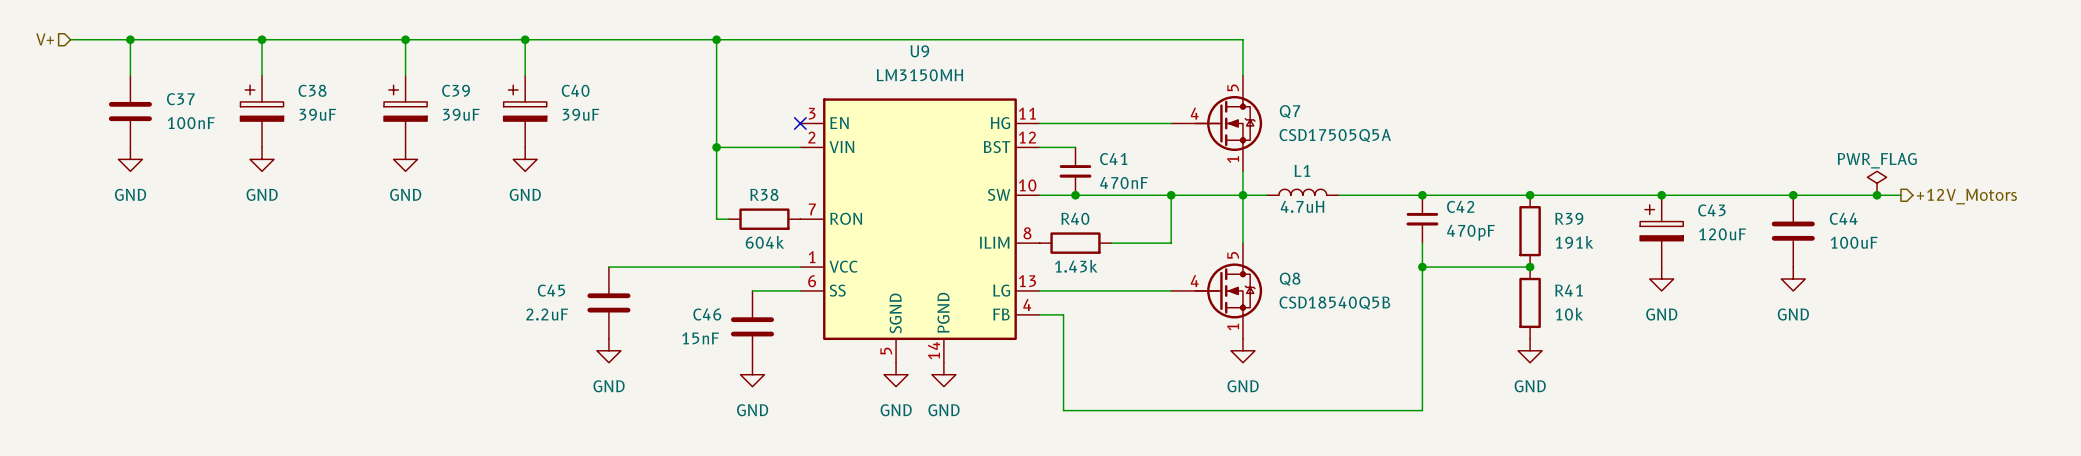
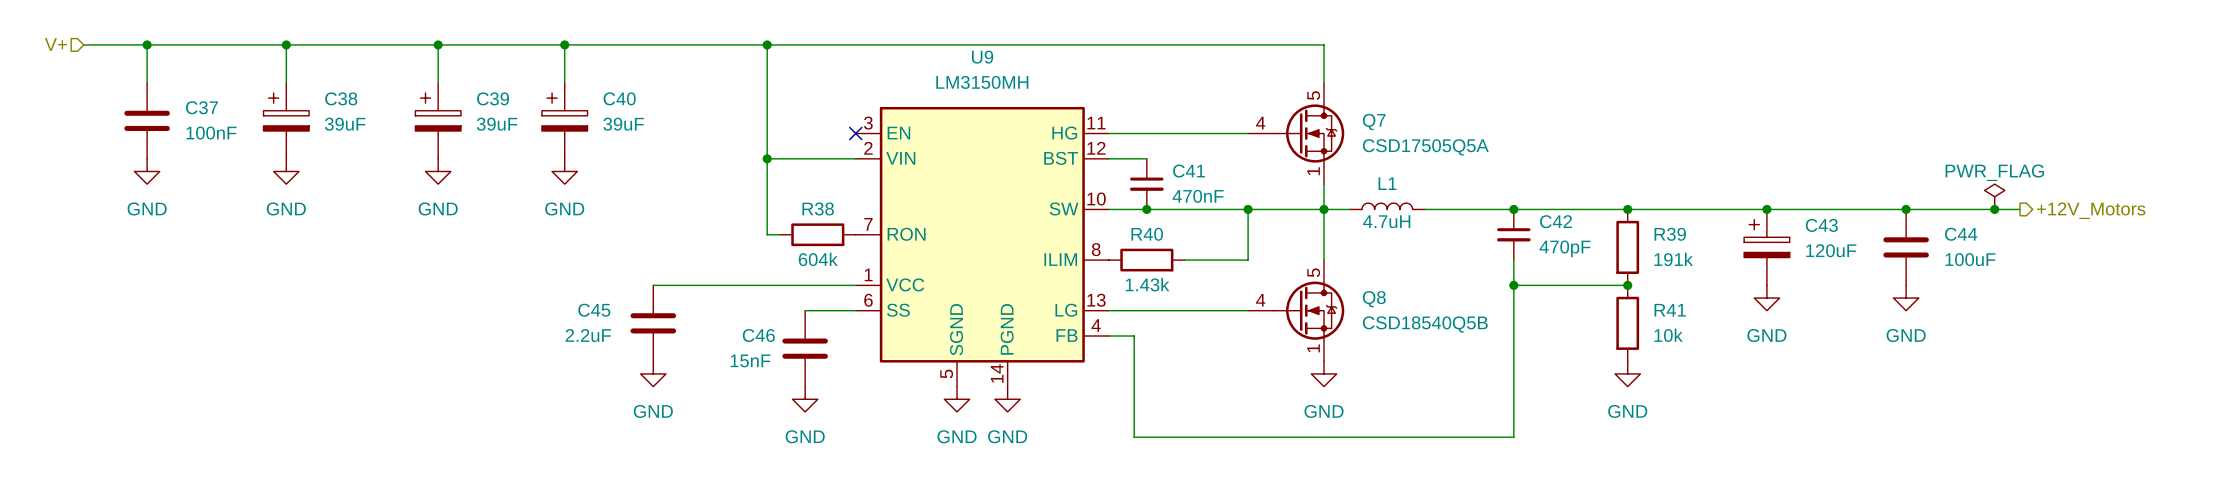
Q7 symbol: [1171, 75, 1263, 172] -> [1248, 82, 1345, 185]
Q8 symbol: [1171, 243, 1263, 339] -> [1248, 260, 1345, 362]

